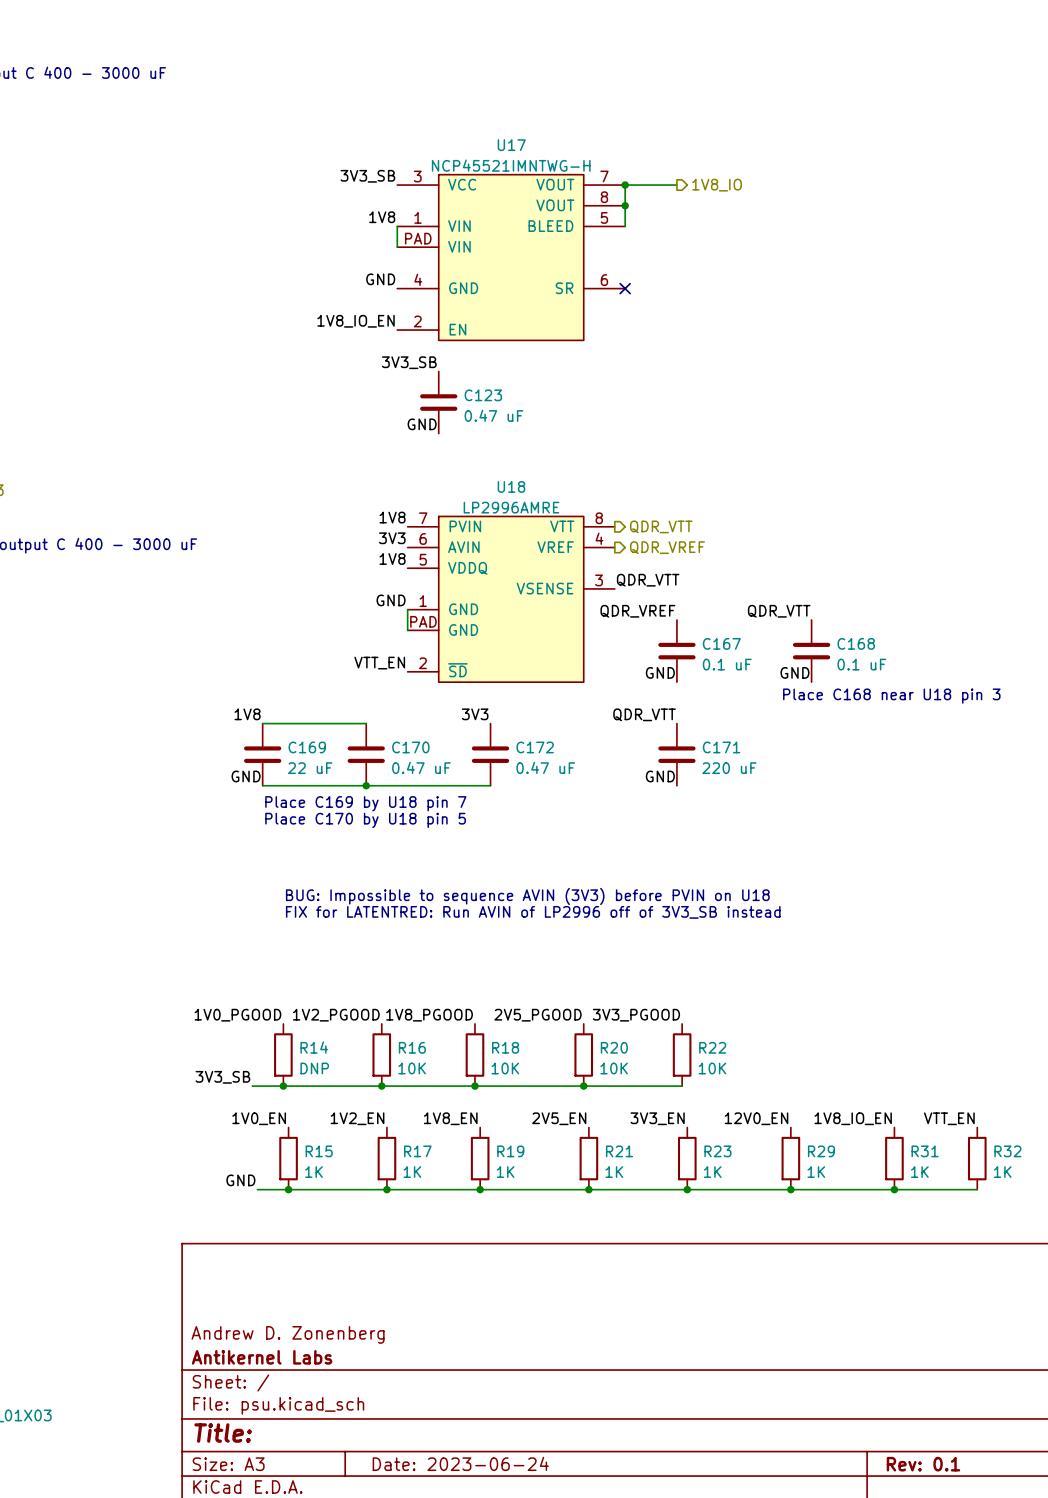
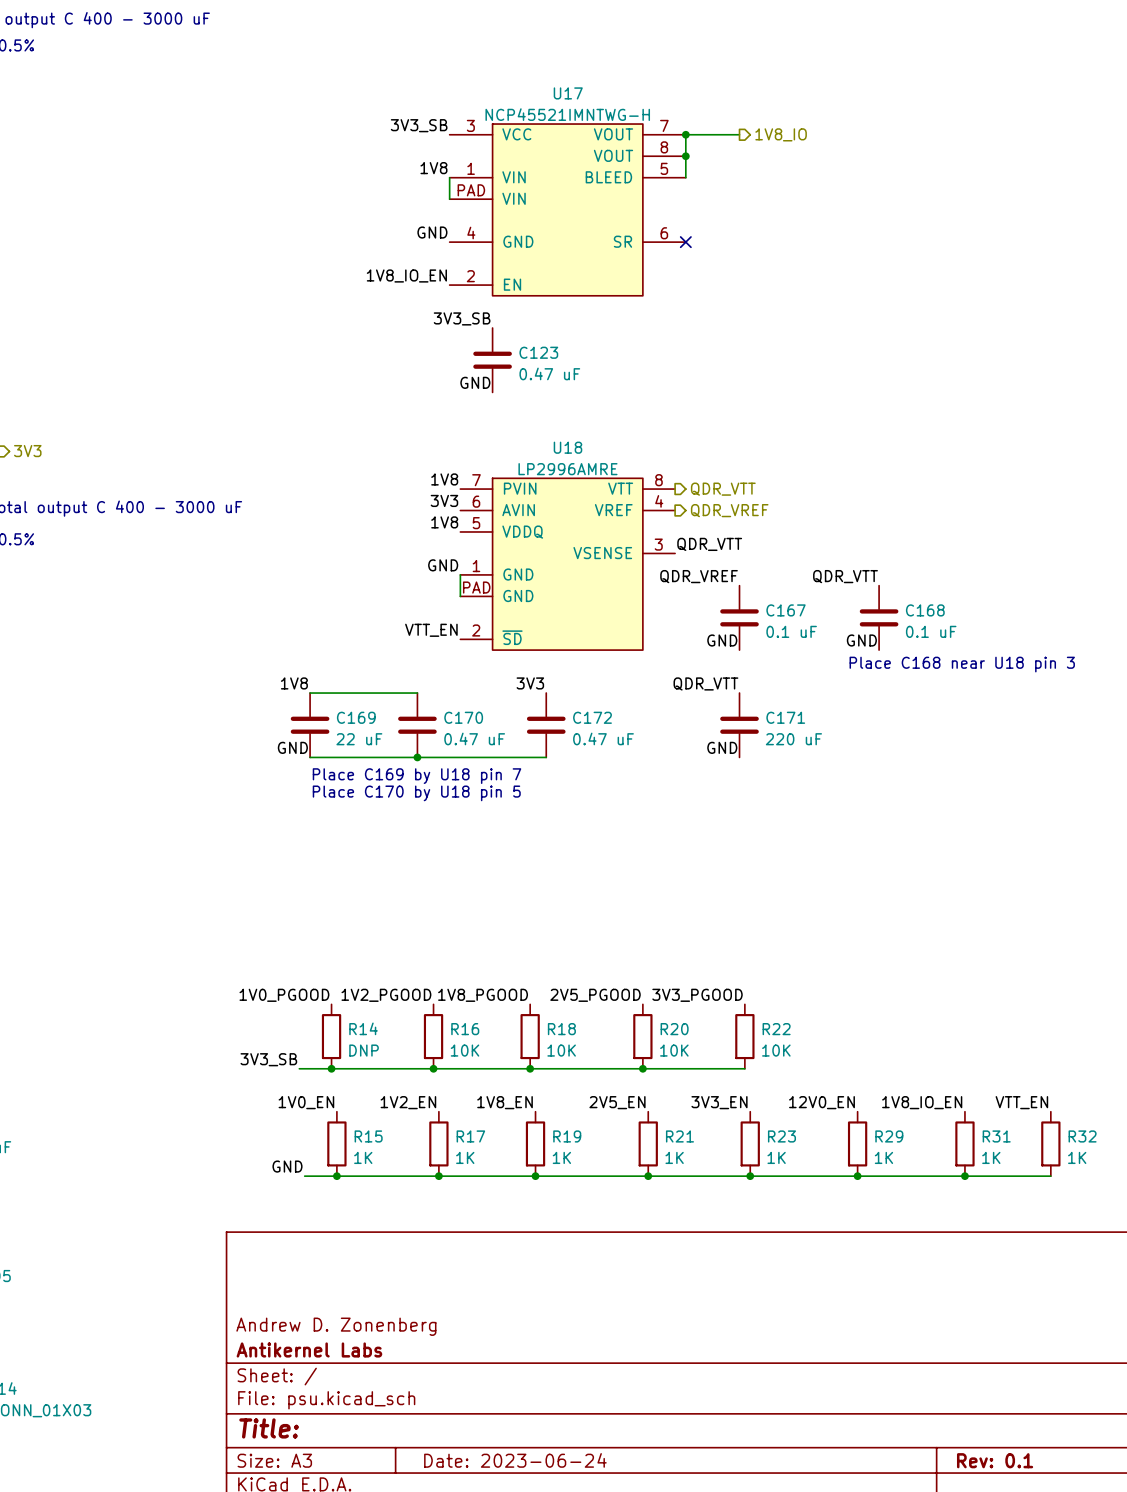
text: BUG: Impossible to sequence AVIN (3V3) before PVIN on U18 (527, 896) -> none
text: FIX for LATENTRED: Run AVIN of LP2996 off of 3V3_SB instead (533, 912) -> none

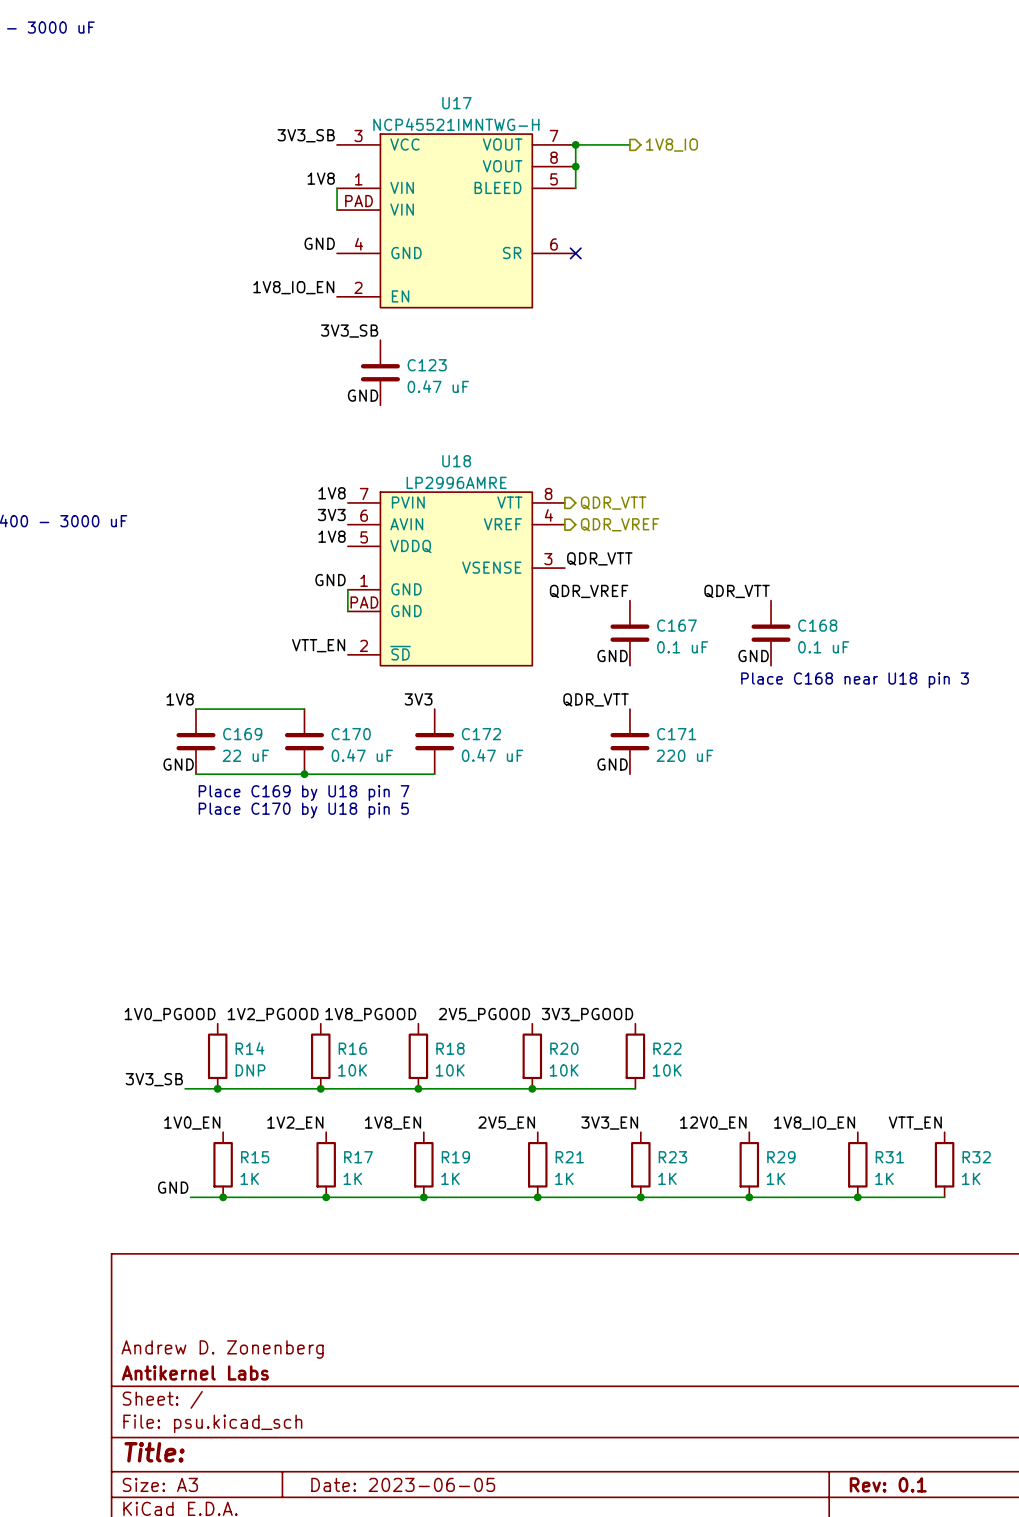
title block: Date: 2023-06-24 (515, 1460) -> Date: 2023-06-05 (403, 1484)

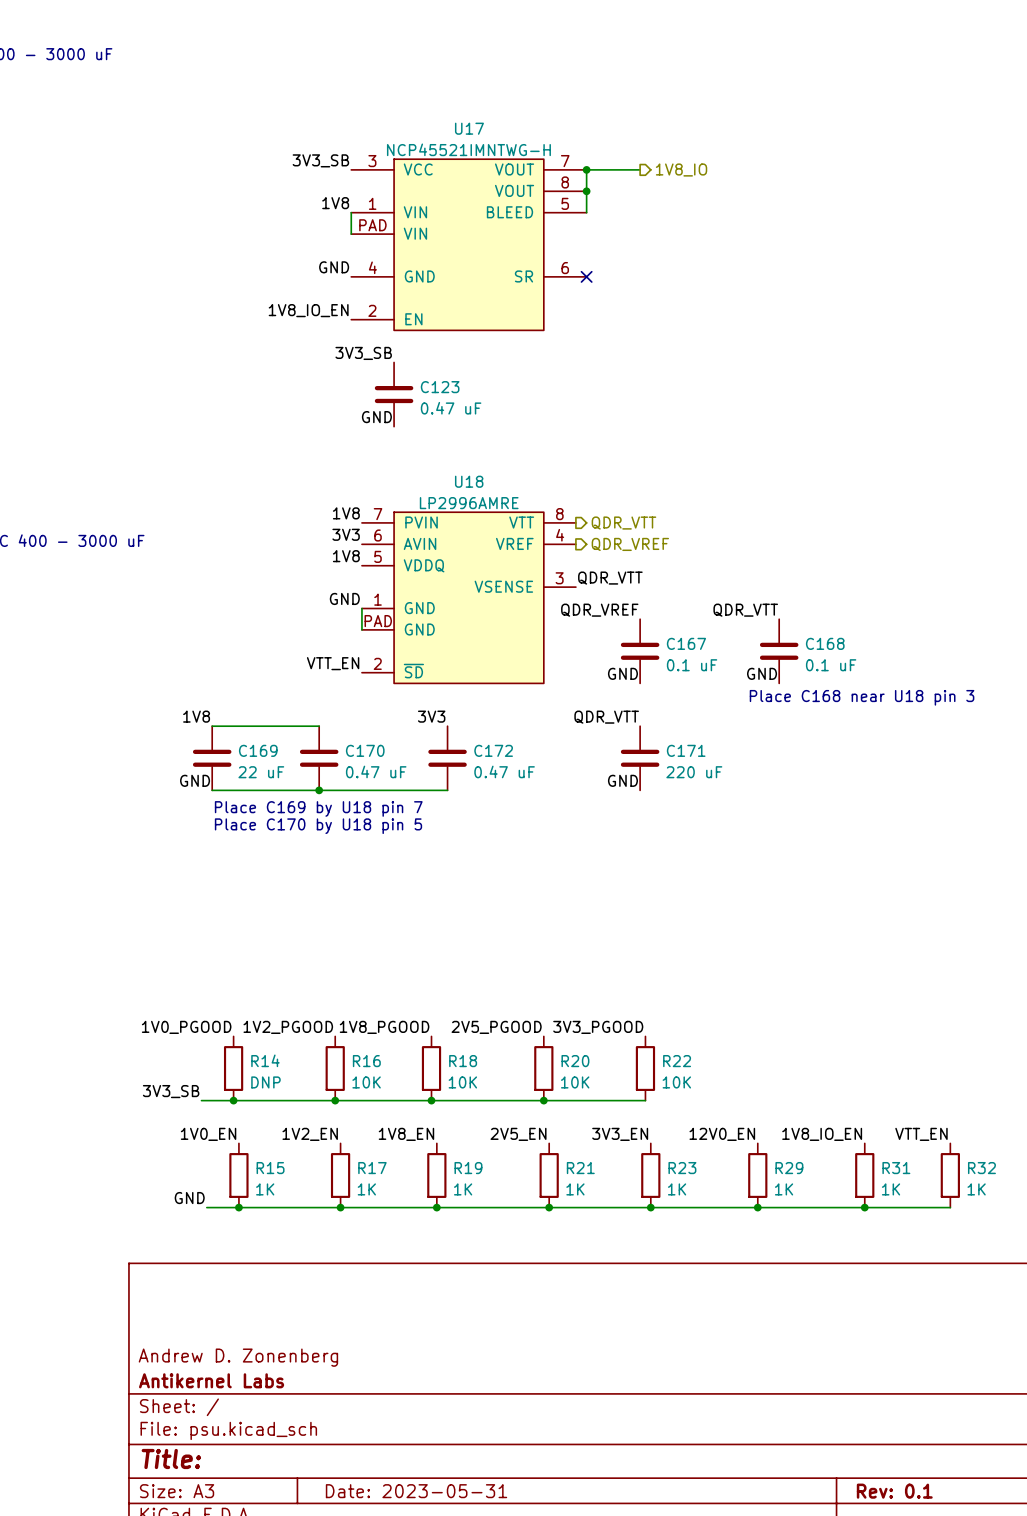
title block: Date: 2023-06-05 (403, 1484) -> Date: 2023-05-31 (416, 1491)

